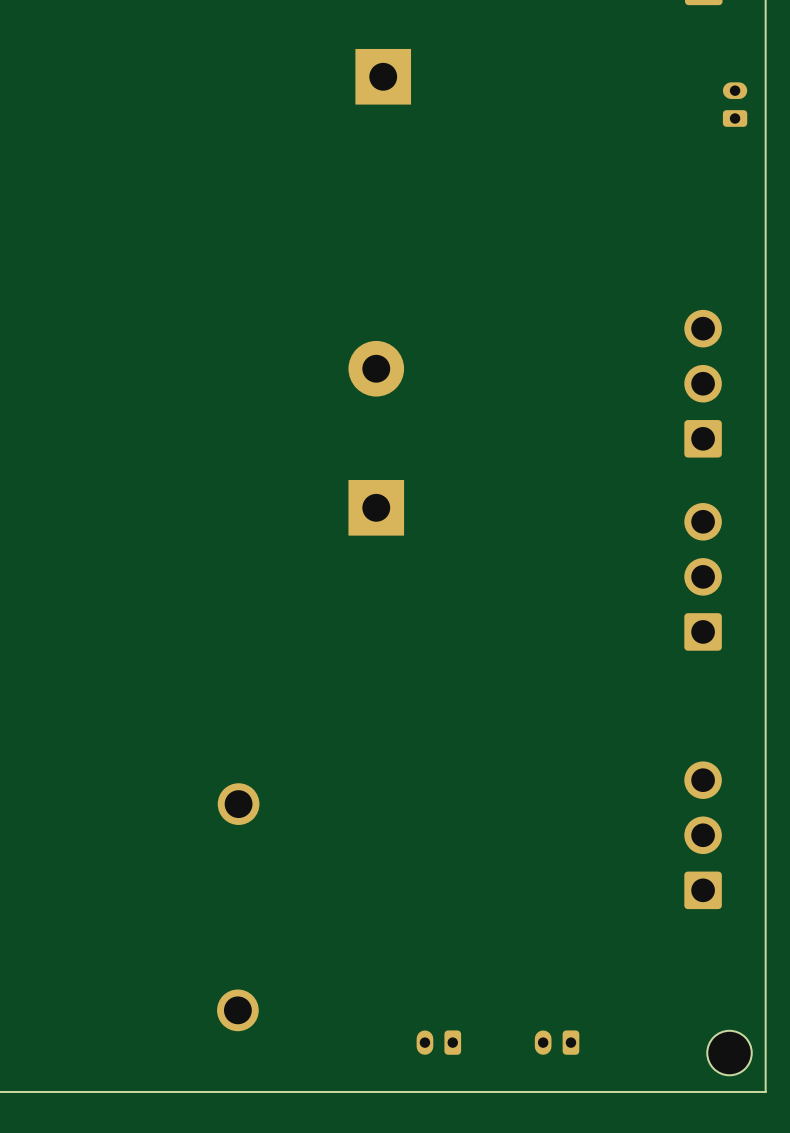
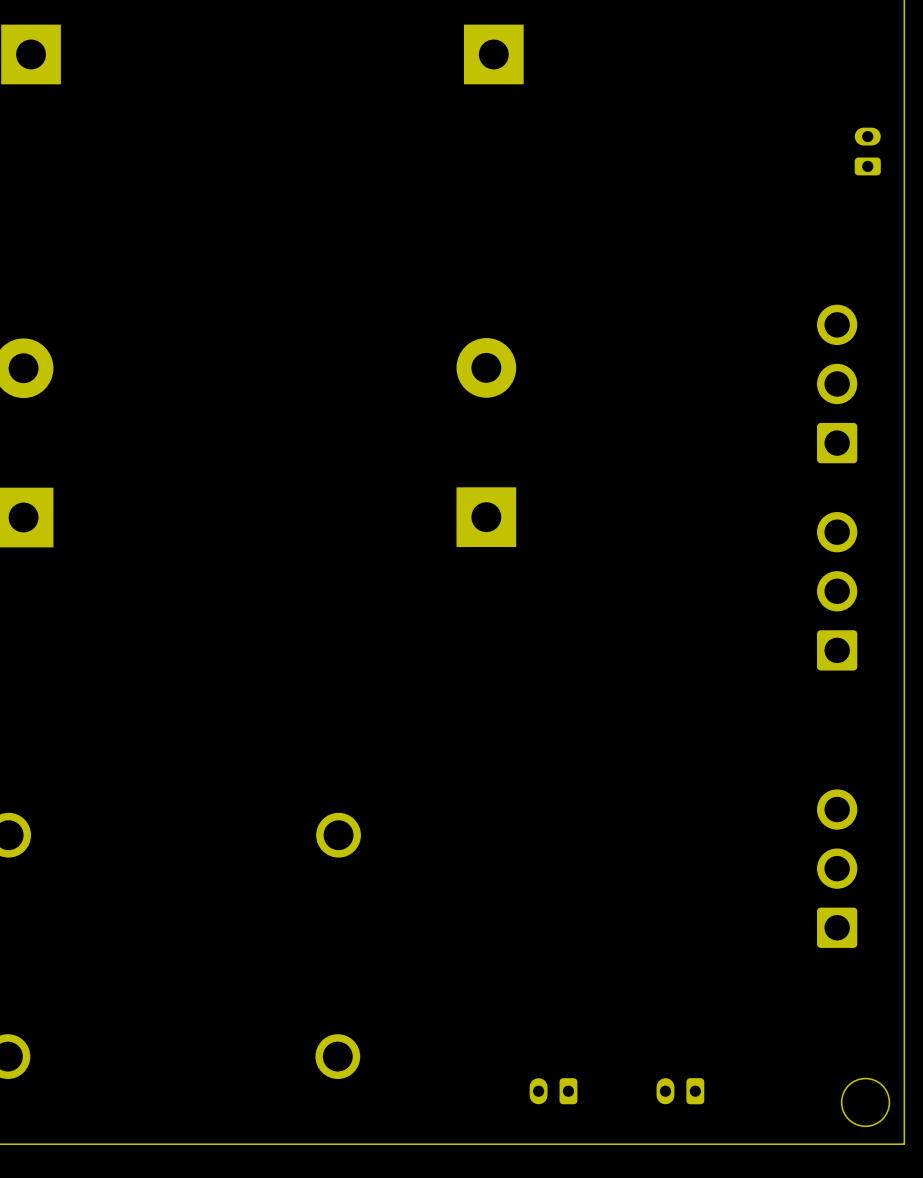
part position: (735, 104) -> (867, 151)

